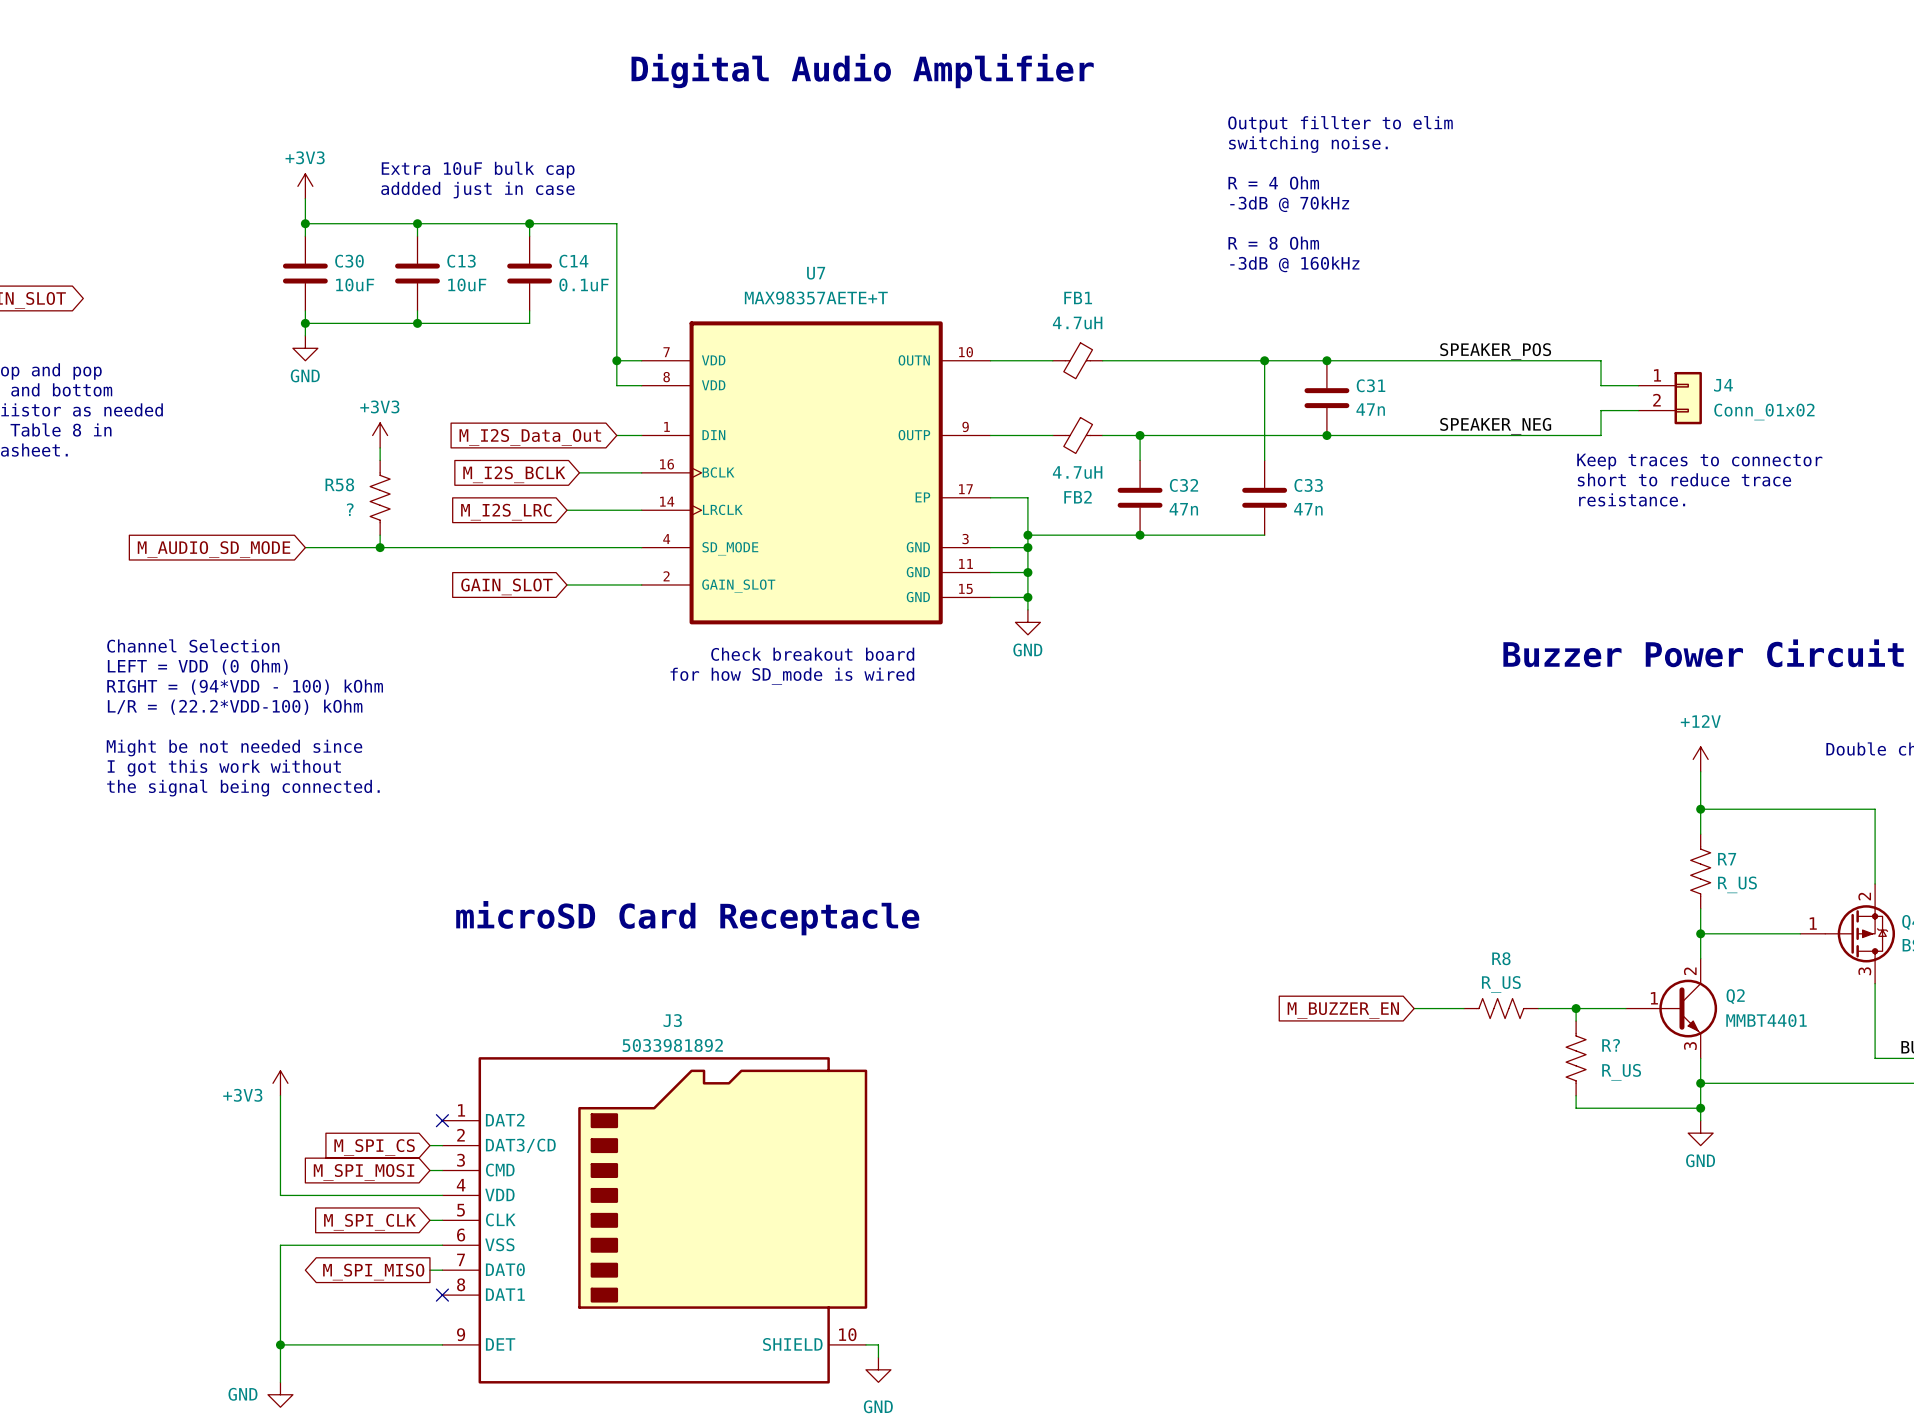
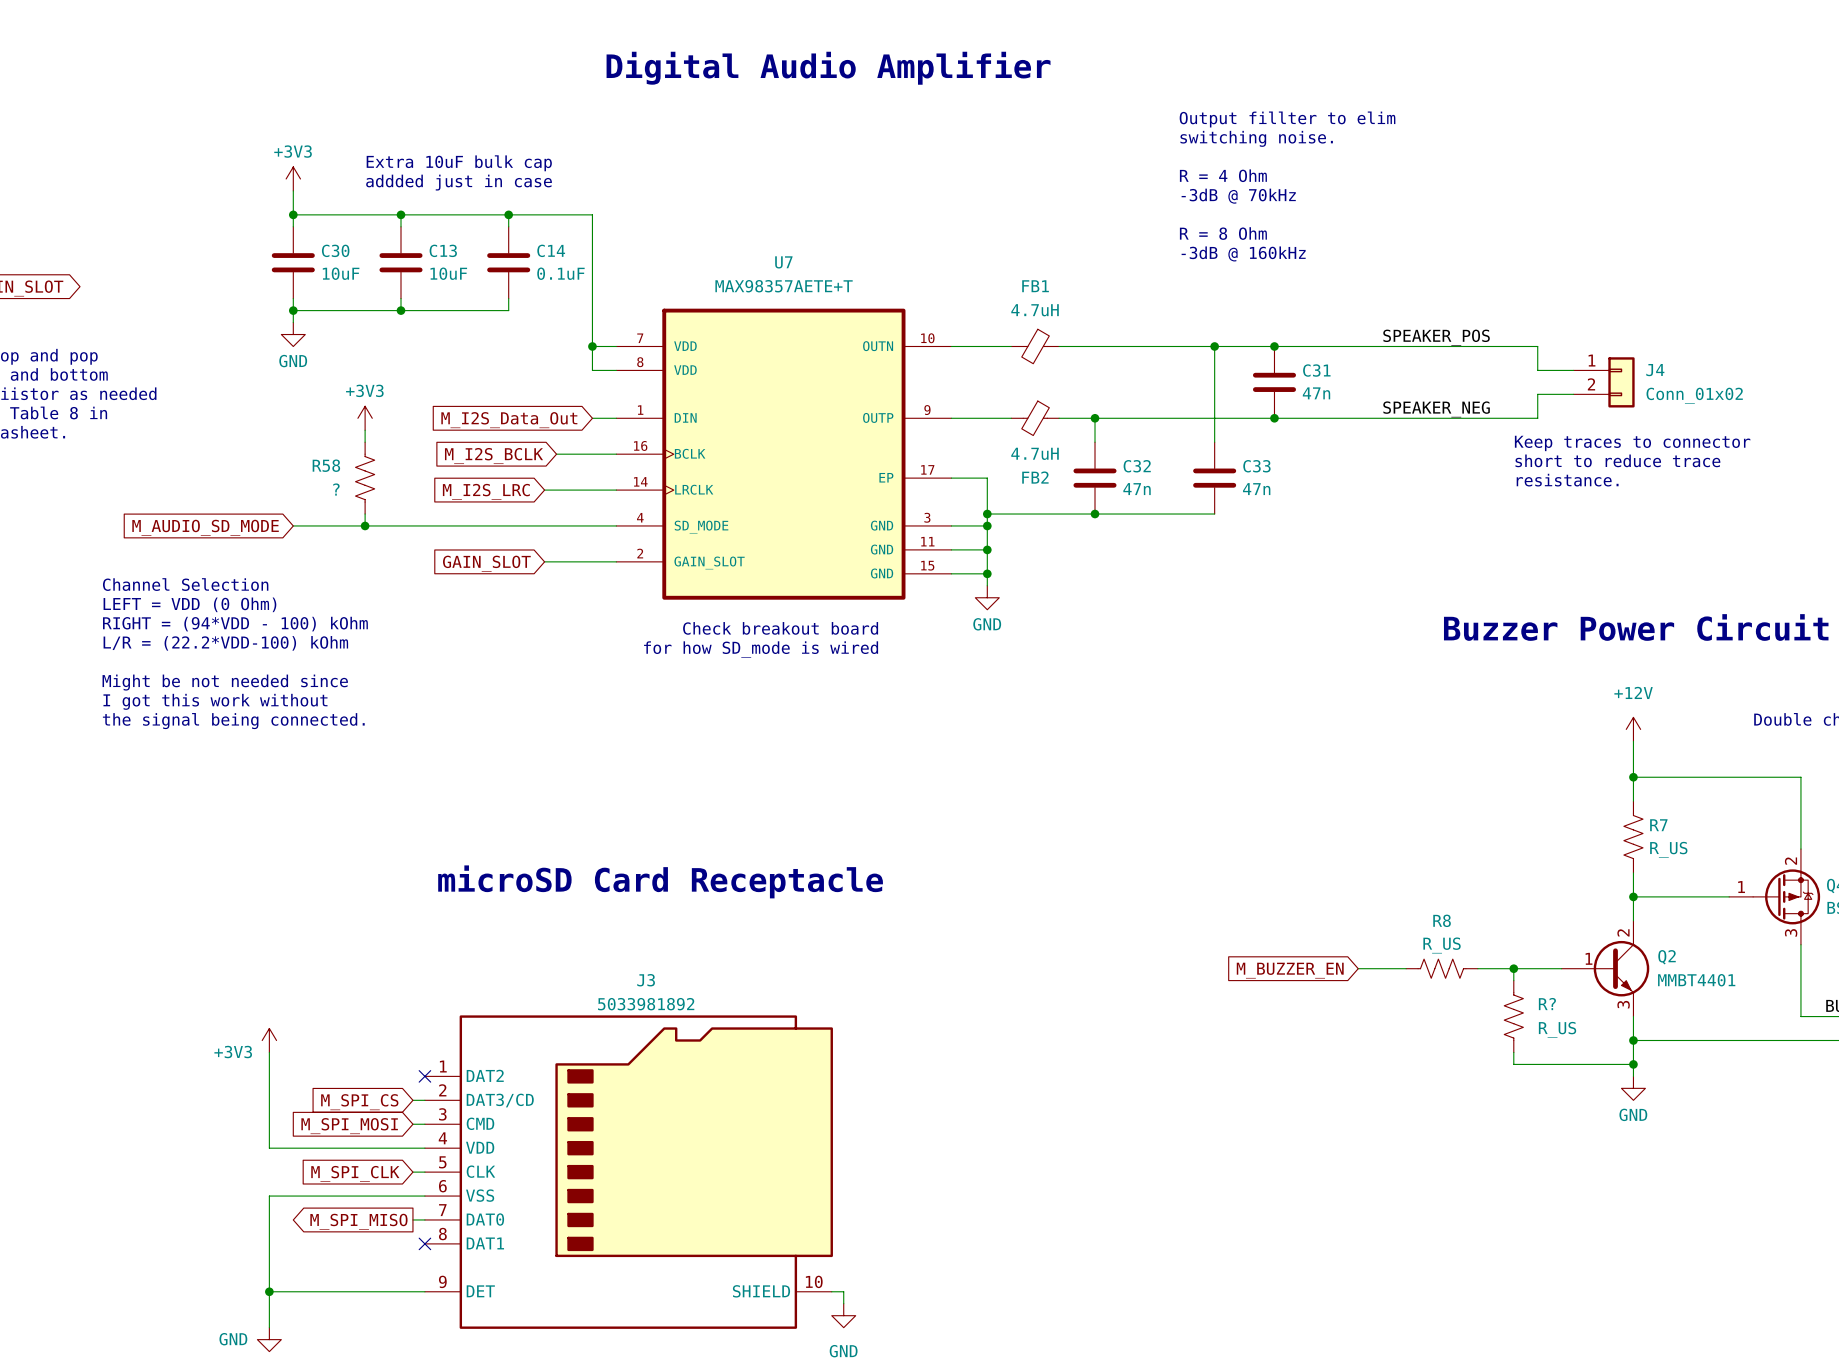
text: none -> Channel Selection (185, 584)
text: none -> LEFT = VDD (0 Ohm) (189, 604)
text: Channel Selection (193, 645) -> RIGHT = (94*VDD - 100) kOhm (235, 624)
text: LEFT = VDD (0 Ohm) (197, 667) -> L/R = (22.2*VDD-100) kOhm (225, 643)
text: RIGHT = (94*VDD - 100) kOhm (245, 687) -> none
text: L/R = (22.2*VDD-100) kOhm (235, 707) -> Might be not needed since (225, 682)
text: Might be not needed since (234, 748) -> the signal being connected. (233, 721)
text position: I got this work without (224, 768) -> I got this work without (215, 701)
text: the signal being connected. (243, 788) -> none

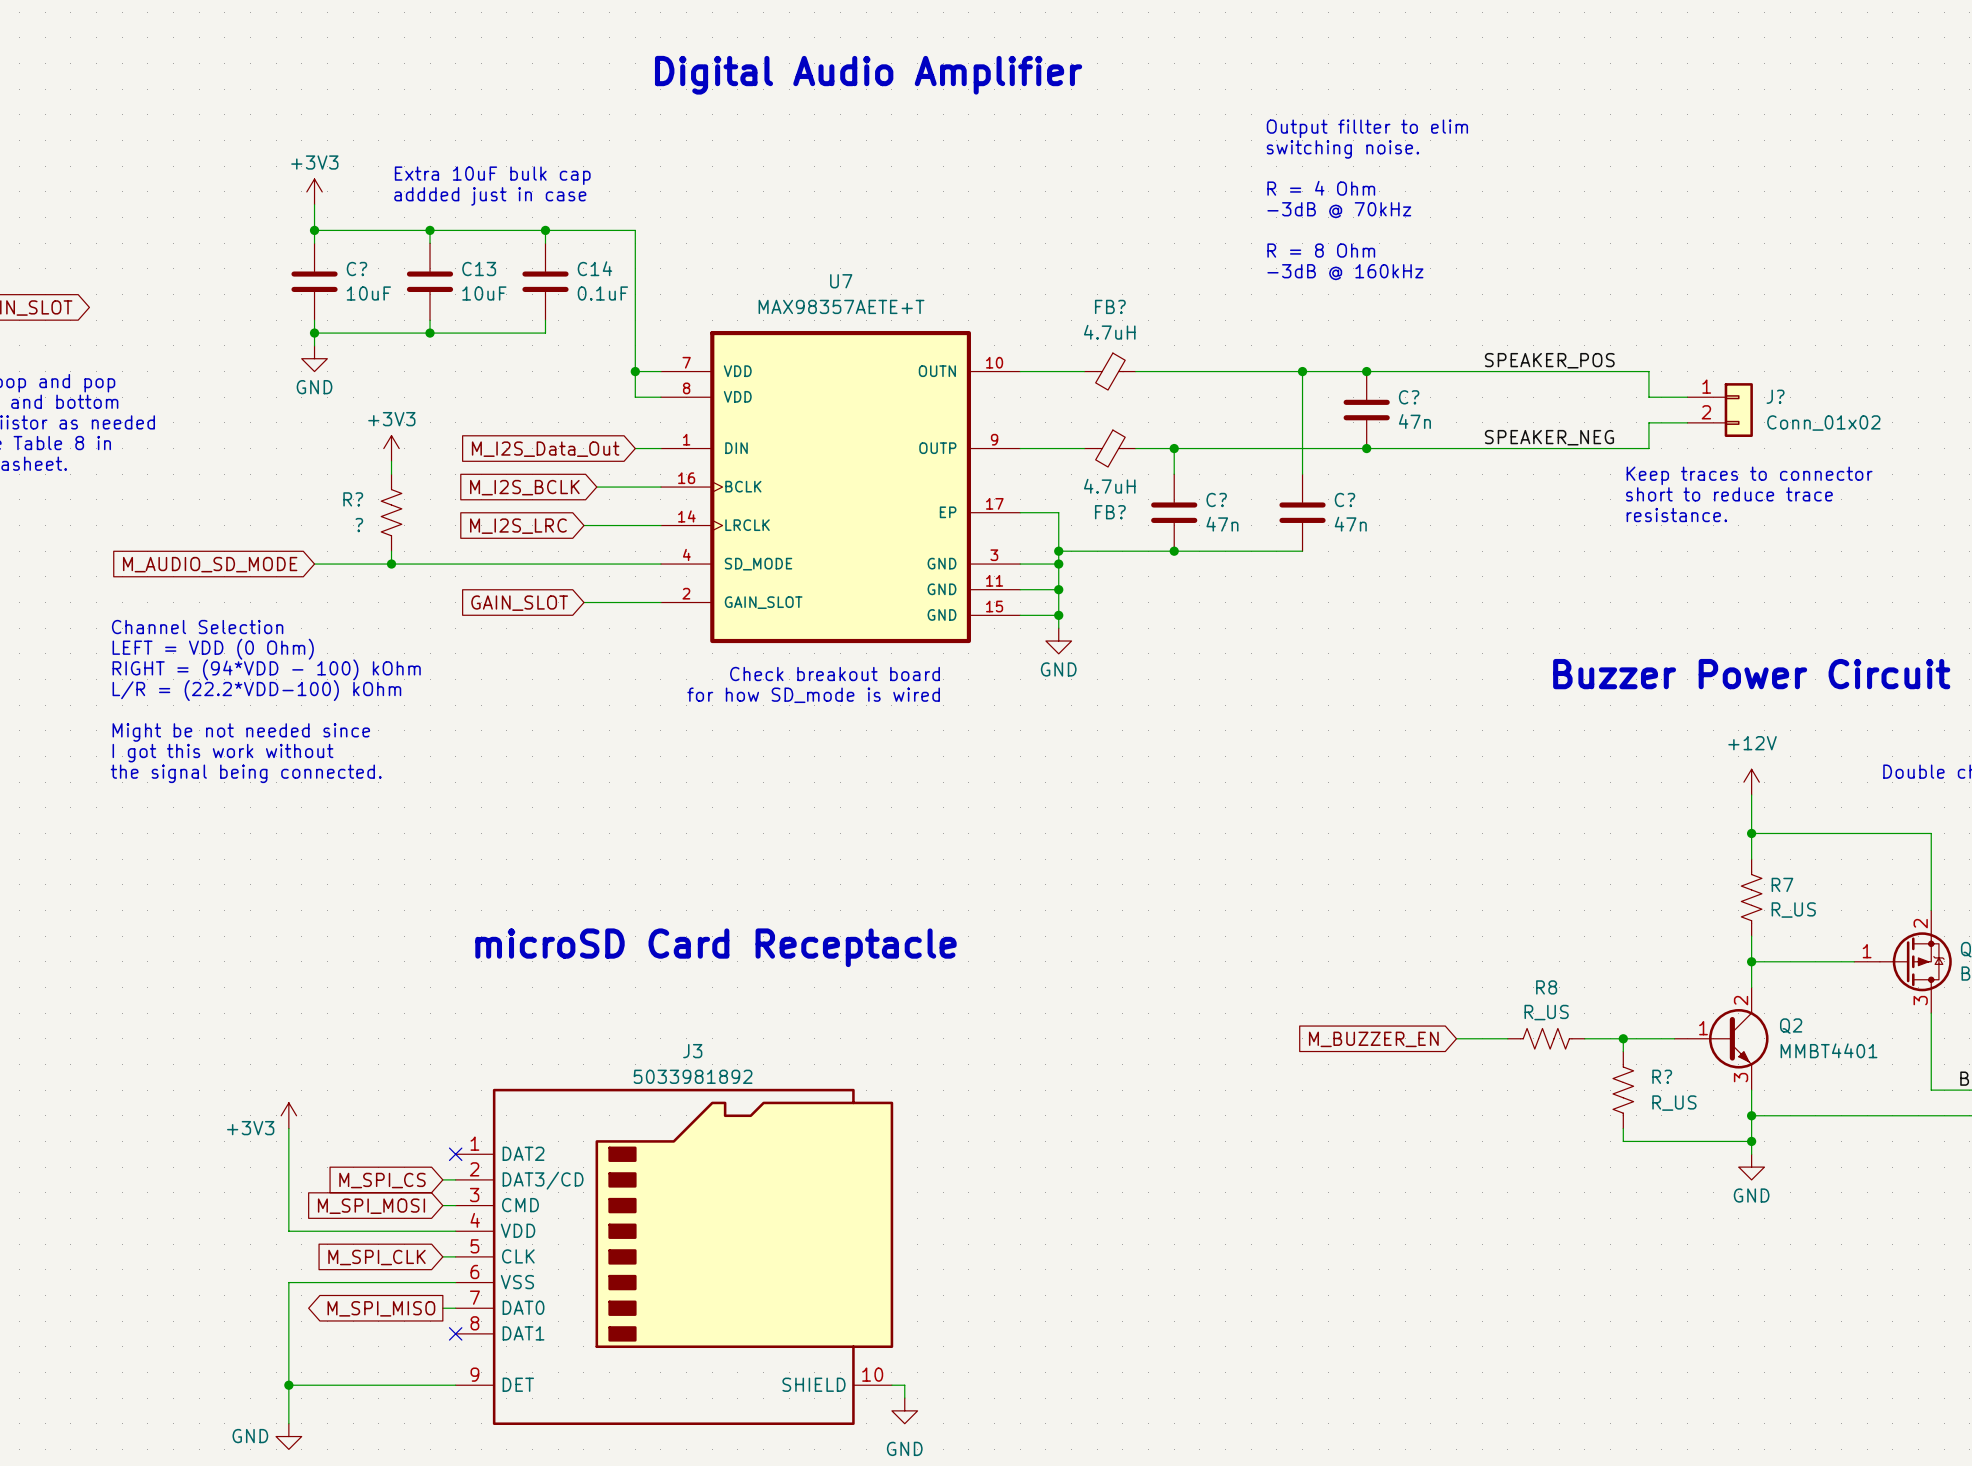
C30 name: C30 (335, 250) -> C? (356, 269)
FB1 name: FB1 (1035, 286) -> FB? (1110, 306)
C31 name: C31 (1316, 370) -> C? (1409, 397)
J4 name: J4 (1655, 370) -> J? (1775, 396)
R58 name: R58 (326, 465) -> R? (353, 499)
C32 name: C32 (1137, 466) -> C? (1216, 499)
C33 name: C33 (1256, 466) -> C? (1344, 499)
FB2 name: FB2 (1035, 477) -> FB? (1110, 512)

